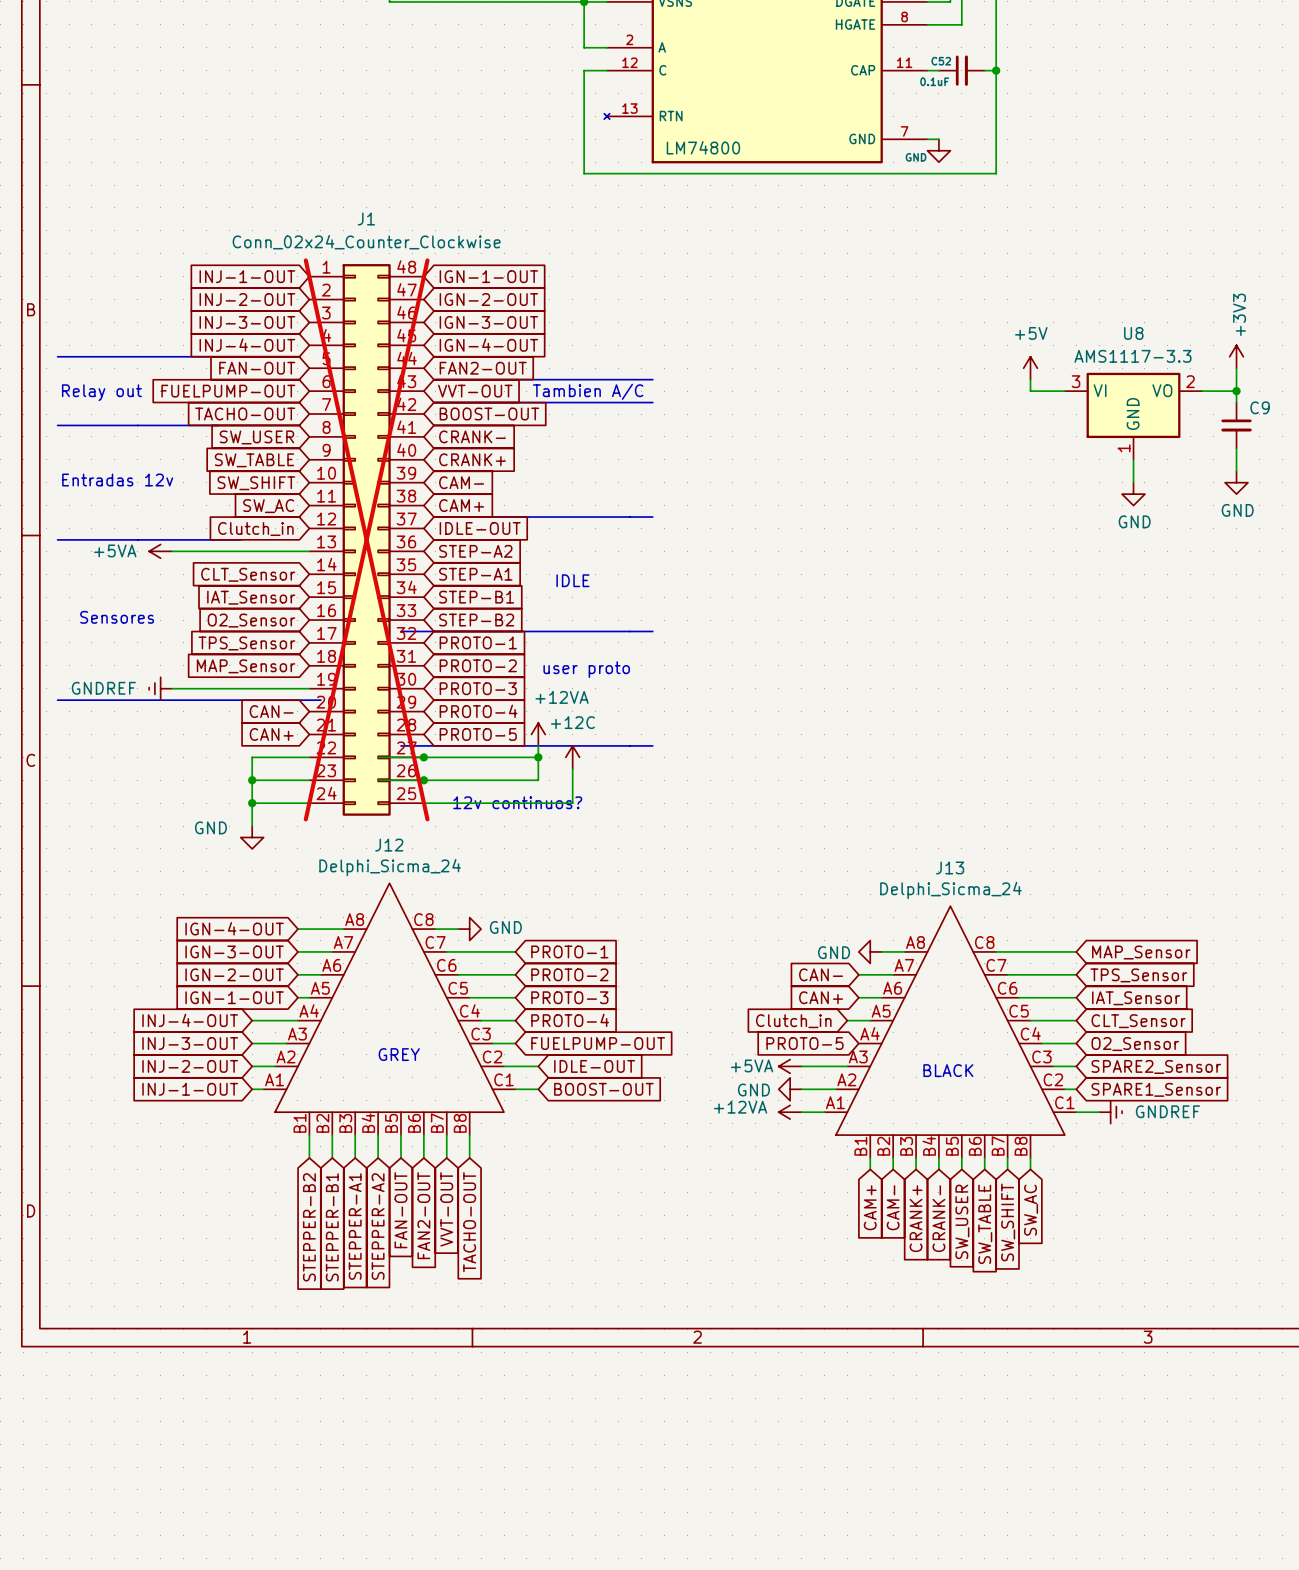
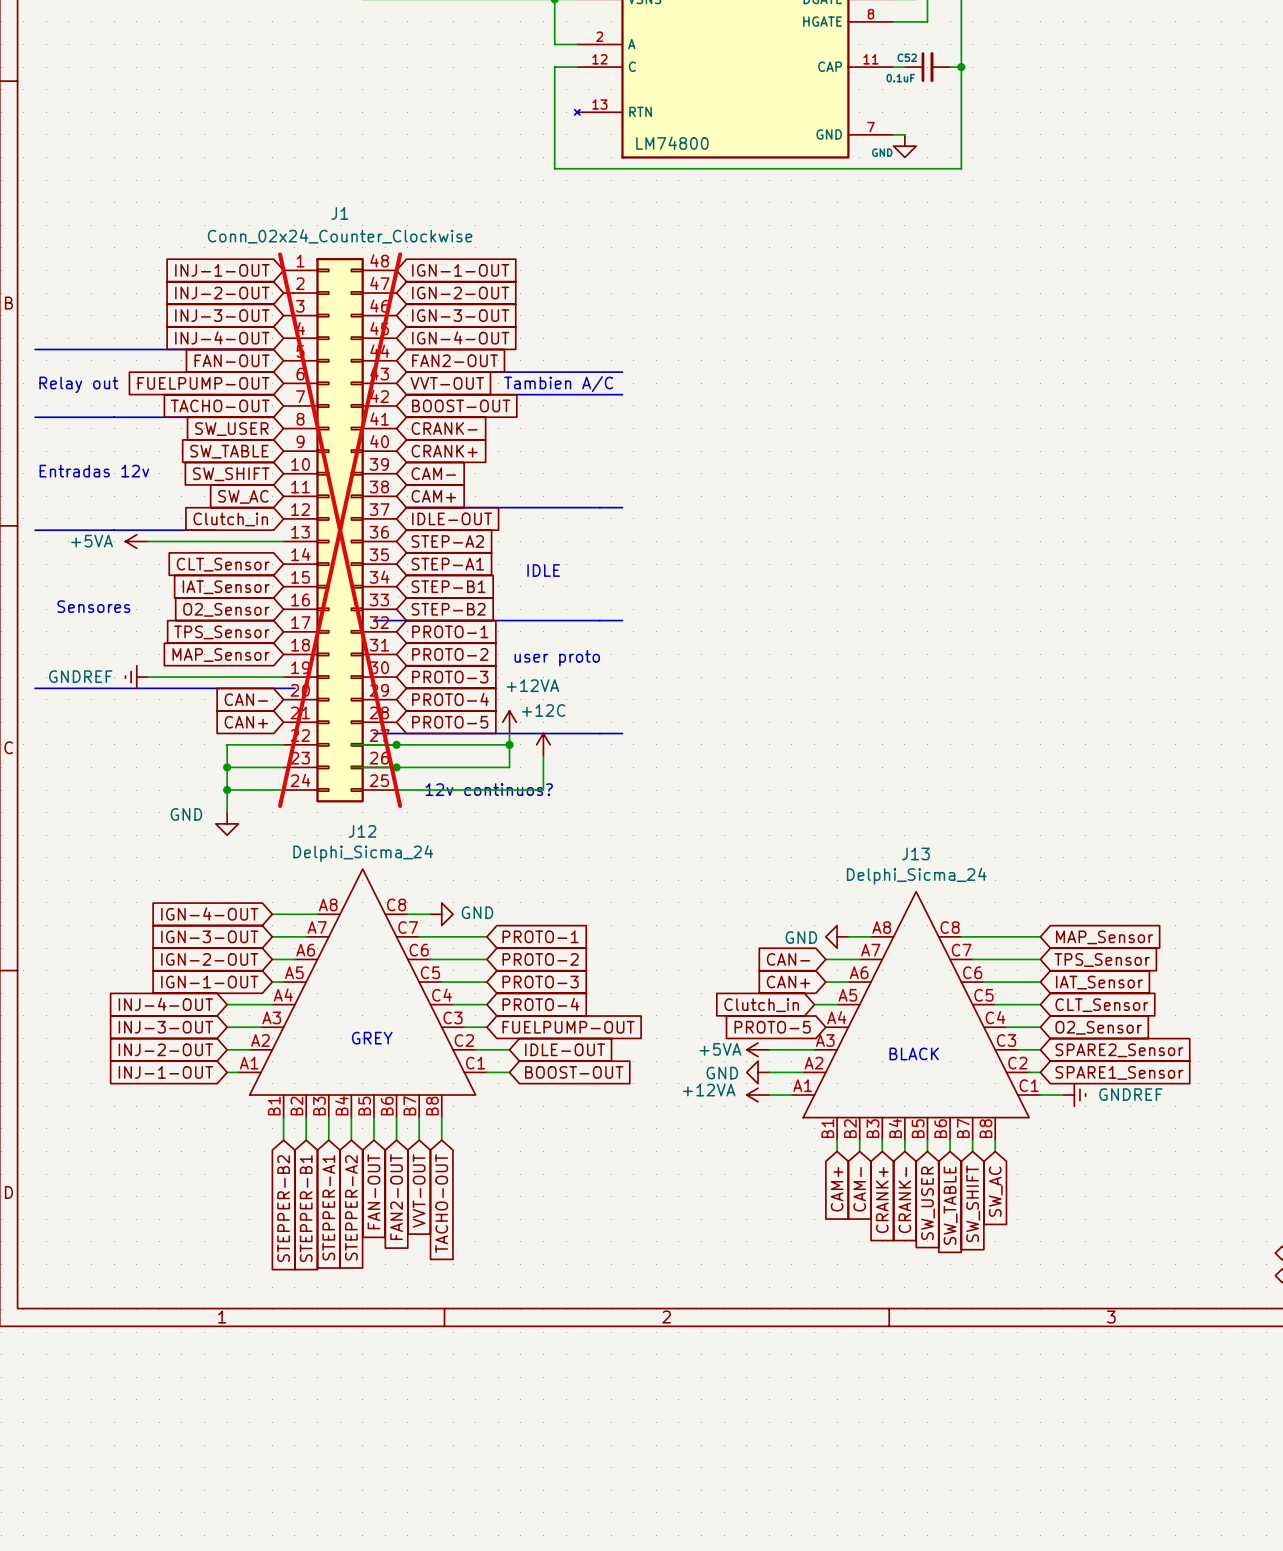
power symbol: +3V3 (1236, 356) -> none
power symbol: +5V (1030, 368) -> none
wire: (1236, 368) (1236, 402) -> none
wire: (1030, 379) (1030, 391) (1064, 391) -> none
wire: (1202, 391) (1236, 391) -> none
junction: (1236, 391) -> none
U8: AMS1117-3.3 (1133, 416) -> none
C9: (1236, 425) -> none
wire: (1236, 448) (1236, 471) -> none
wire: (1133, 459) (1133, 482) -> none
power symbol: GND (1236, 482) -> none
power symbol: GND (1133, 494) -> none

